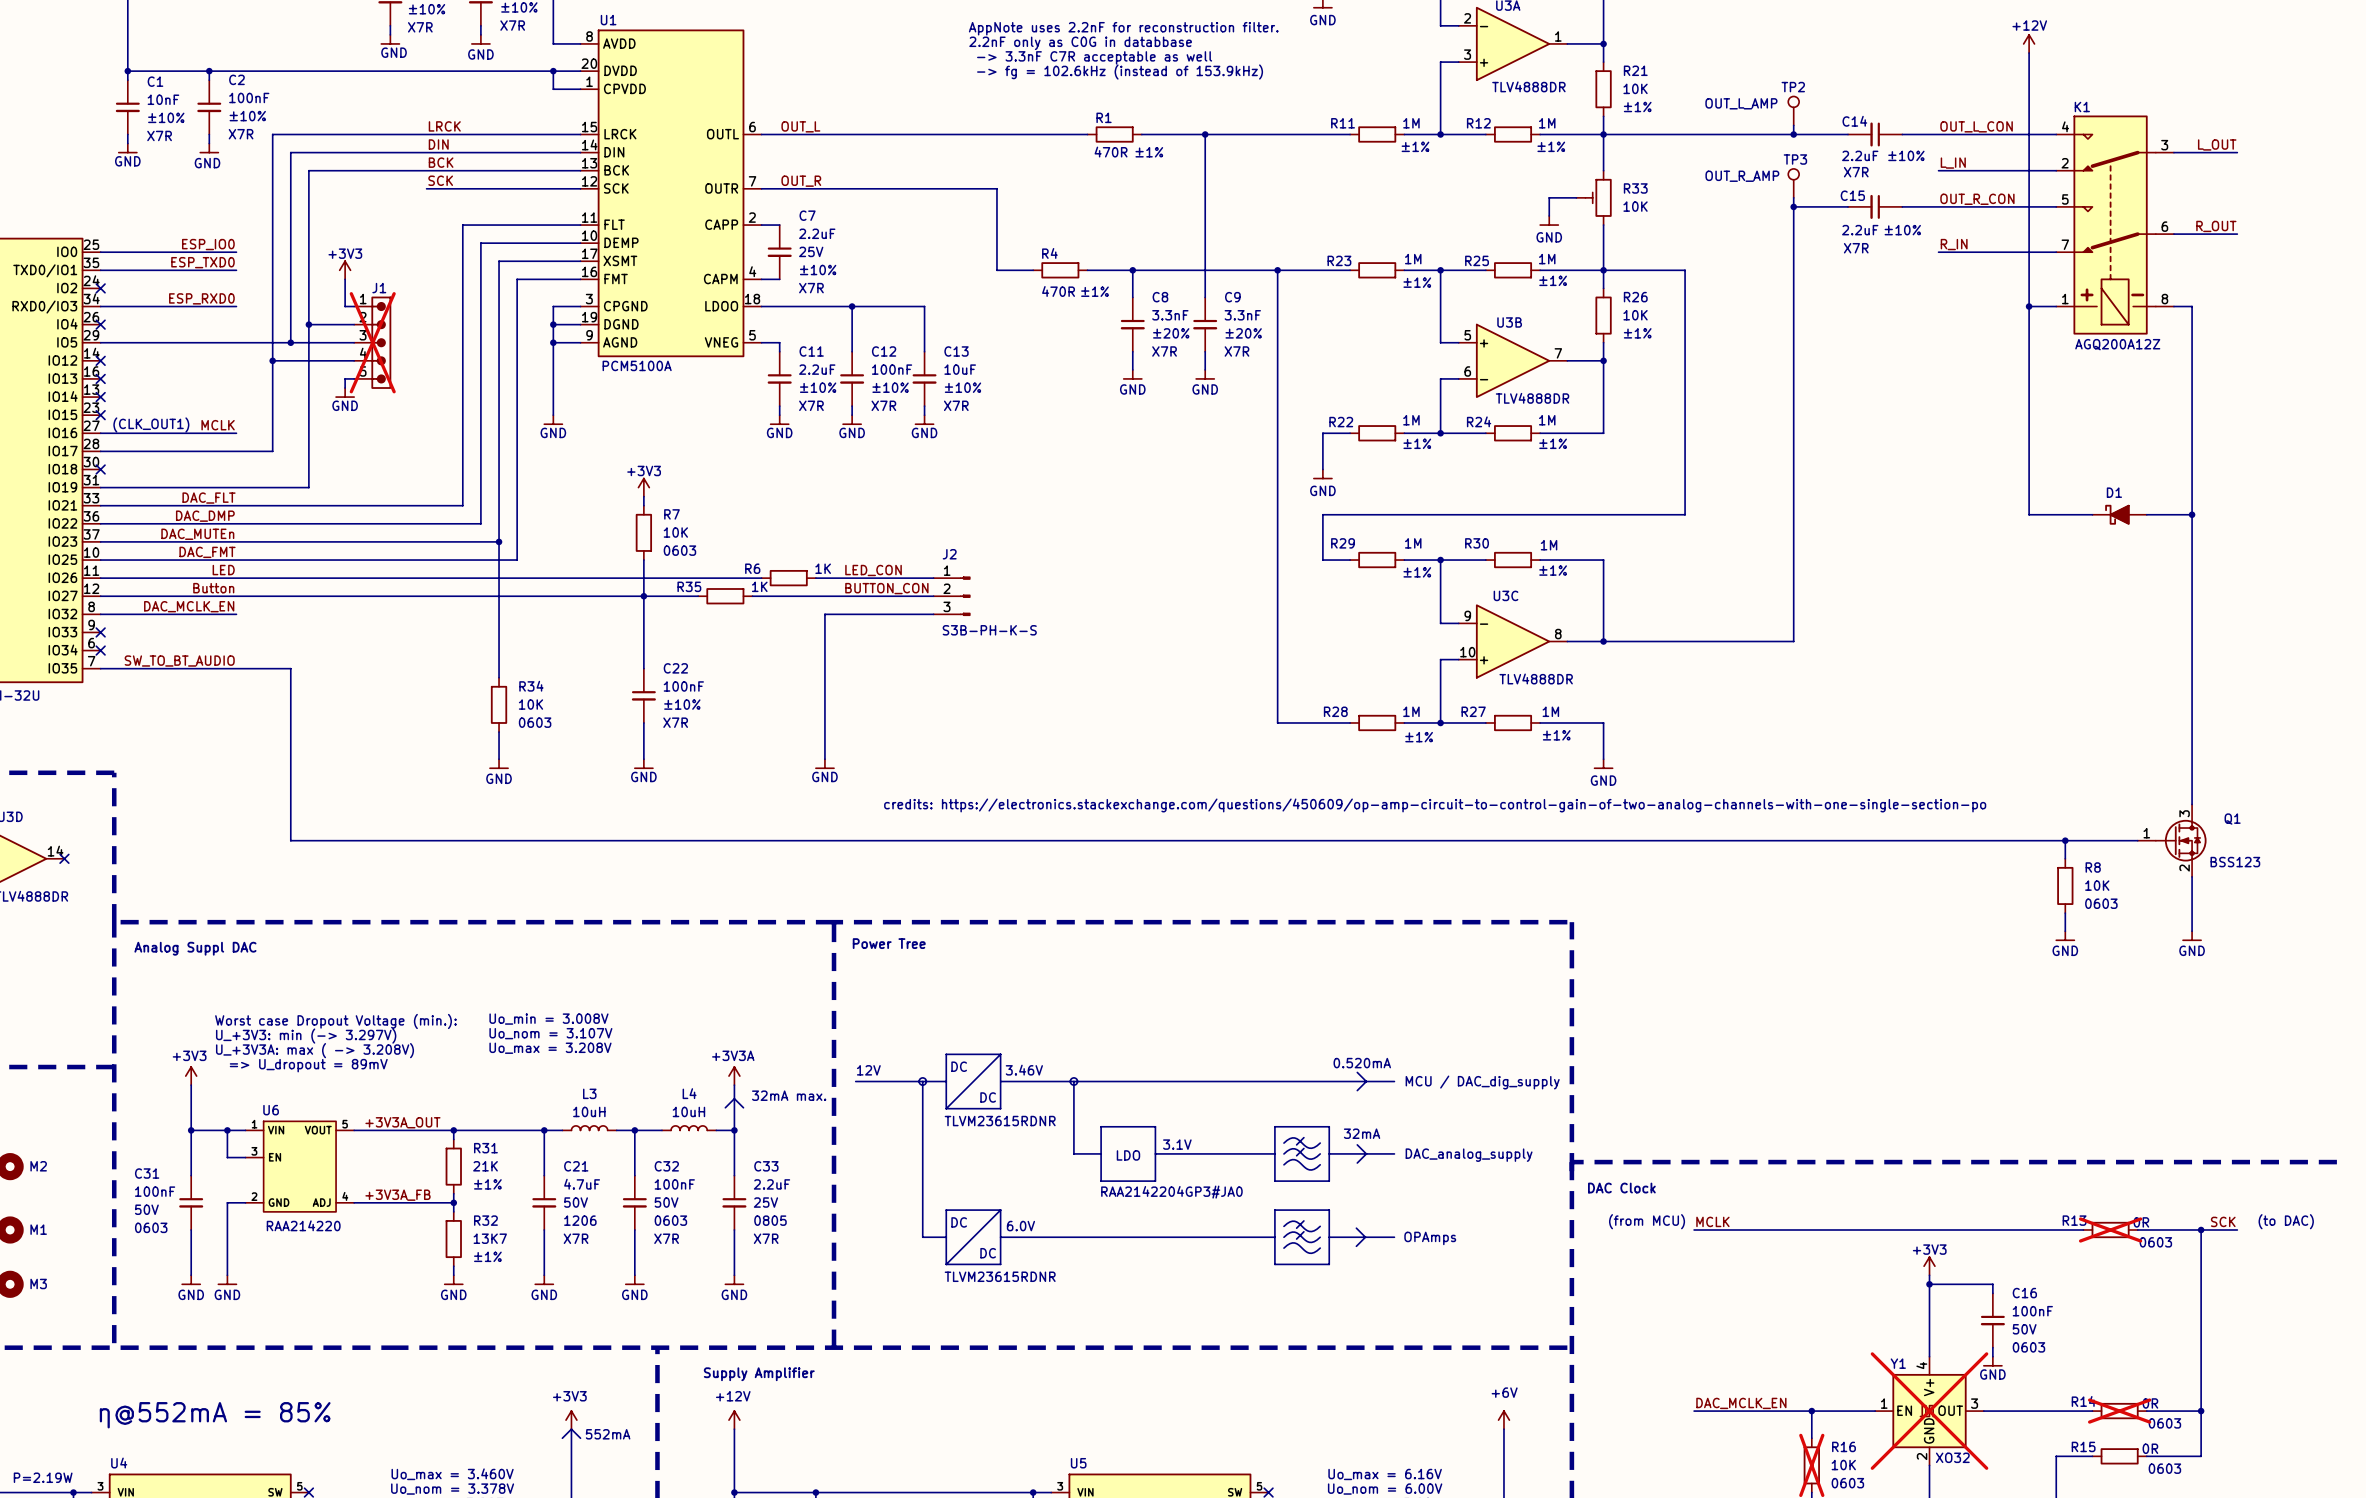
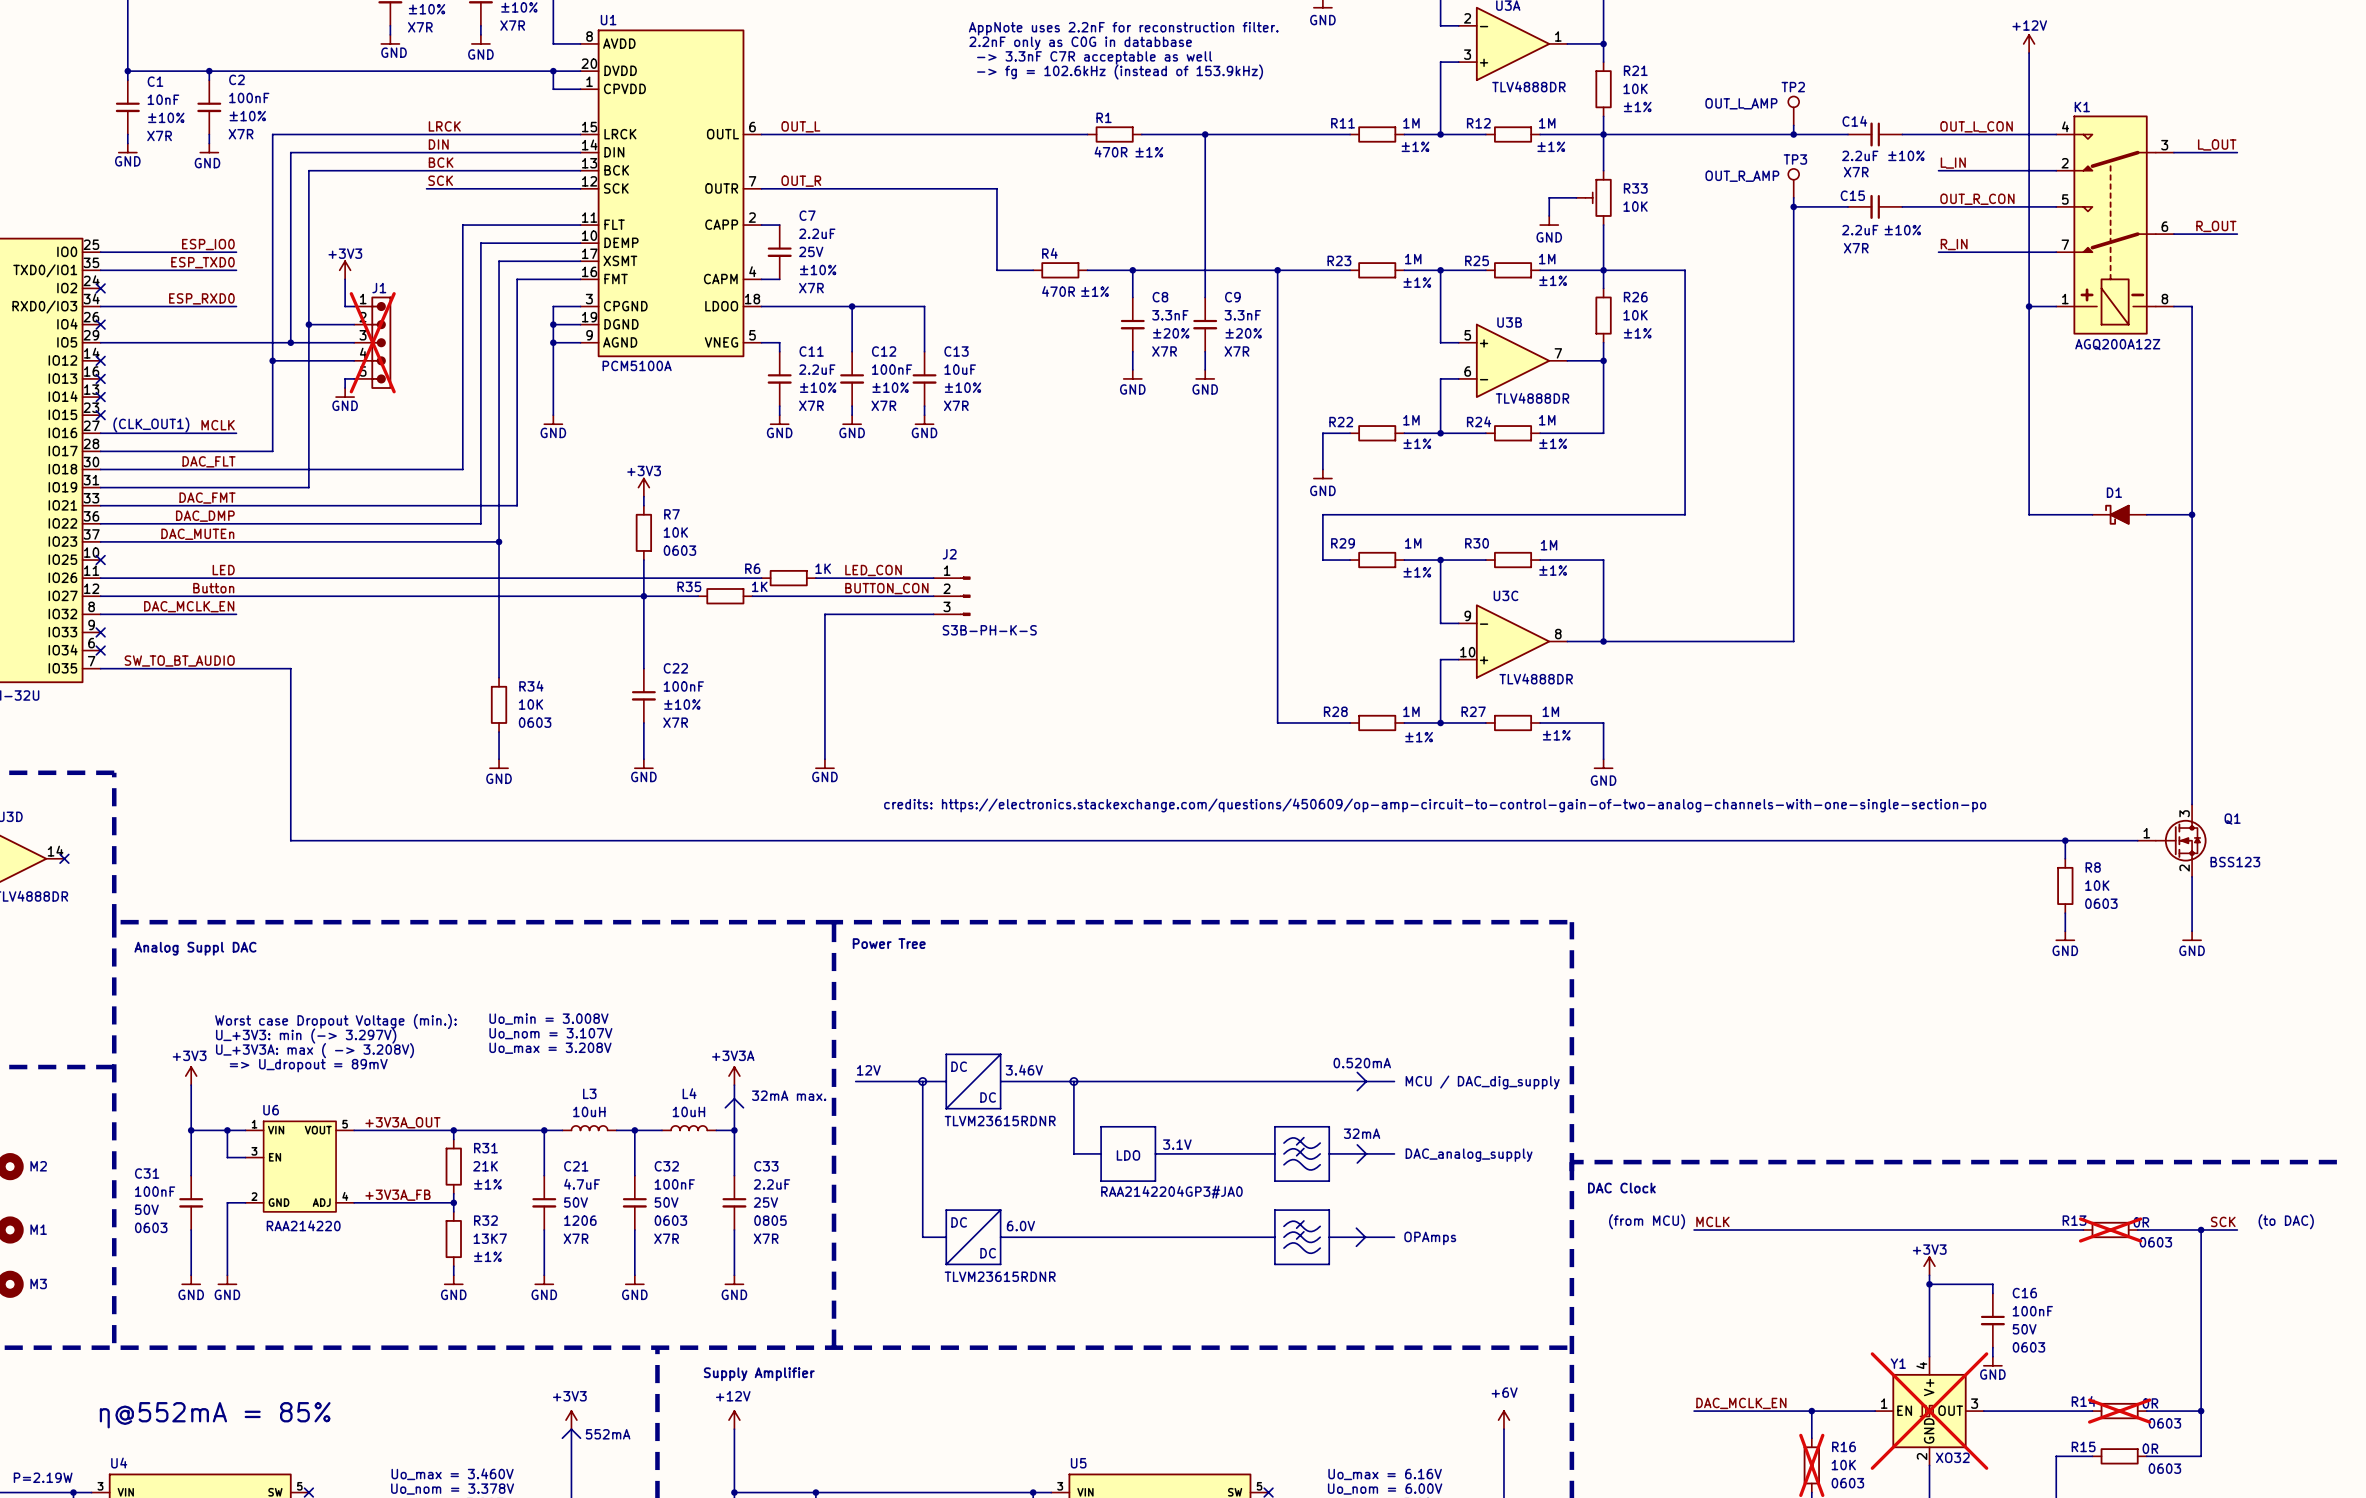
label: none -> DAC_FLT (209, 461)
wire: none -> (100, 469) (462, 469)
no-connect mark: (100, 469) -> none
wire: (462, 469) (462, 505) -> (517, 505) (462, 505)
label: DAC_FLT (209, 498) -> DAC_FMT (207, 498)
wire: (517, 505) (517, 560) (100, 560) -> none
label: DAC_FMT (207, 552) -> none
no-connect mark: none -> (100, 560)

